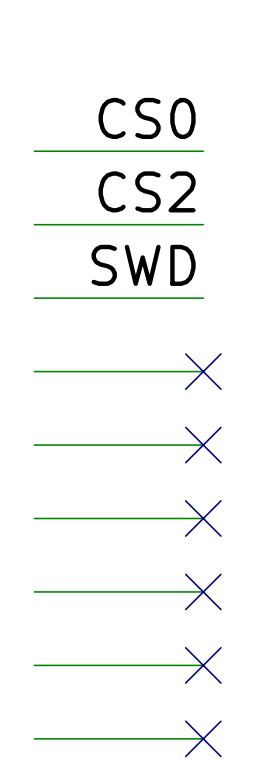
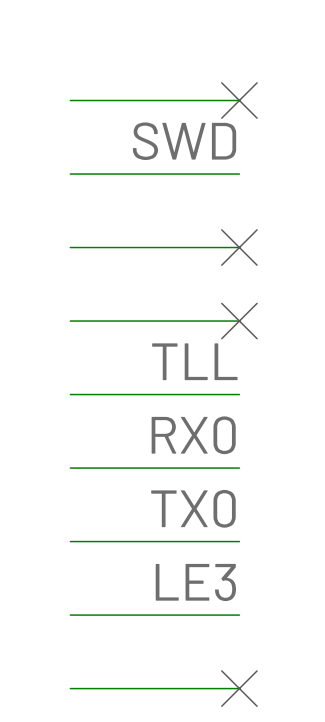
label: CS0 (147, 118) -> none
no-connect mark: none -> (239, 100)
label: CS2 (147, 191) -> SWD (184, 141)
label: SWD (143, 265) -> none
no-connect mark: none -> (239, 247)
label: none -> TLL (194, 361)
no-connect mark: (203, 445) -> none
label: none -> RX0 (193, 435)
no-connect mark: (203, 518) -> none
label: none -> TX0 (193, 508)
no-connect mark: (203, 591) -> none
label: none -> LE3 (195, 582)
no-connect mark: (203, 665) -> none

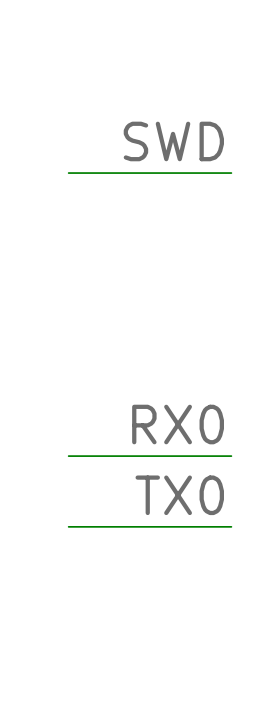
wire: (70, 100) (239, 100) -> none
no-connect mark: (239, 100) -> none
wire: (70, 247) (239, 247) -> none
no-connect mark: (239, 247) -> none
wire: (70, 321) (239, 321) -> none
no-connect mark: (239, 321) -> none
label: TLL (194, 361) -> none
wire: (70, 394) (239, 394) -> none
label: LE3 (195, 582) -> none
wire: (70, 615) (239, 615) -> none
wire: (70, 688) (239, 688) -> none
no-connect mark: (239, 688) -> none

